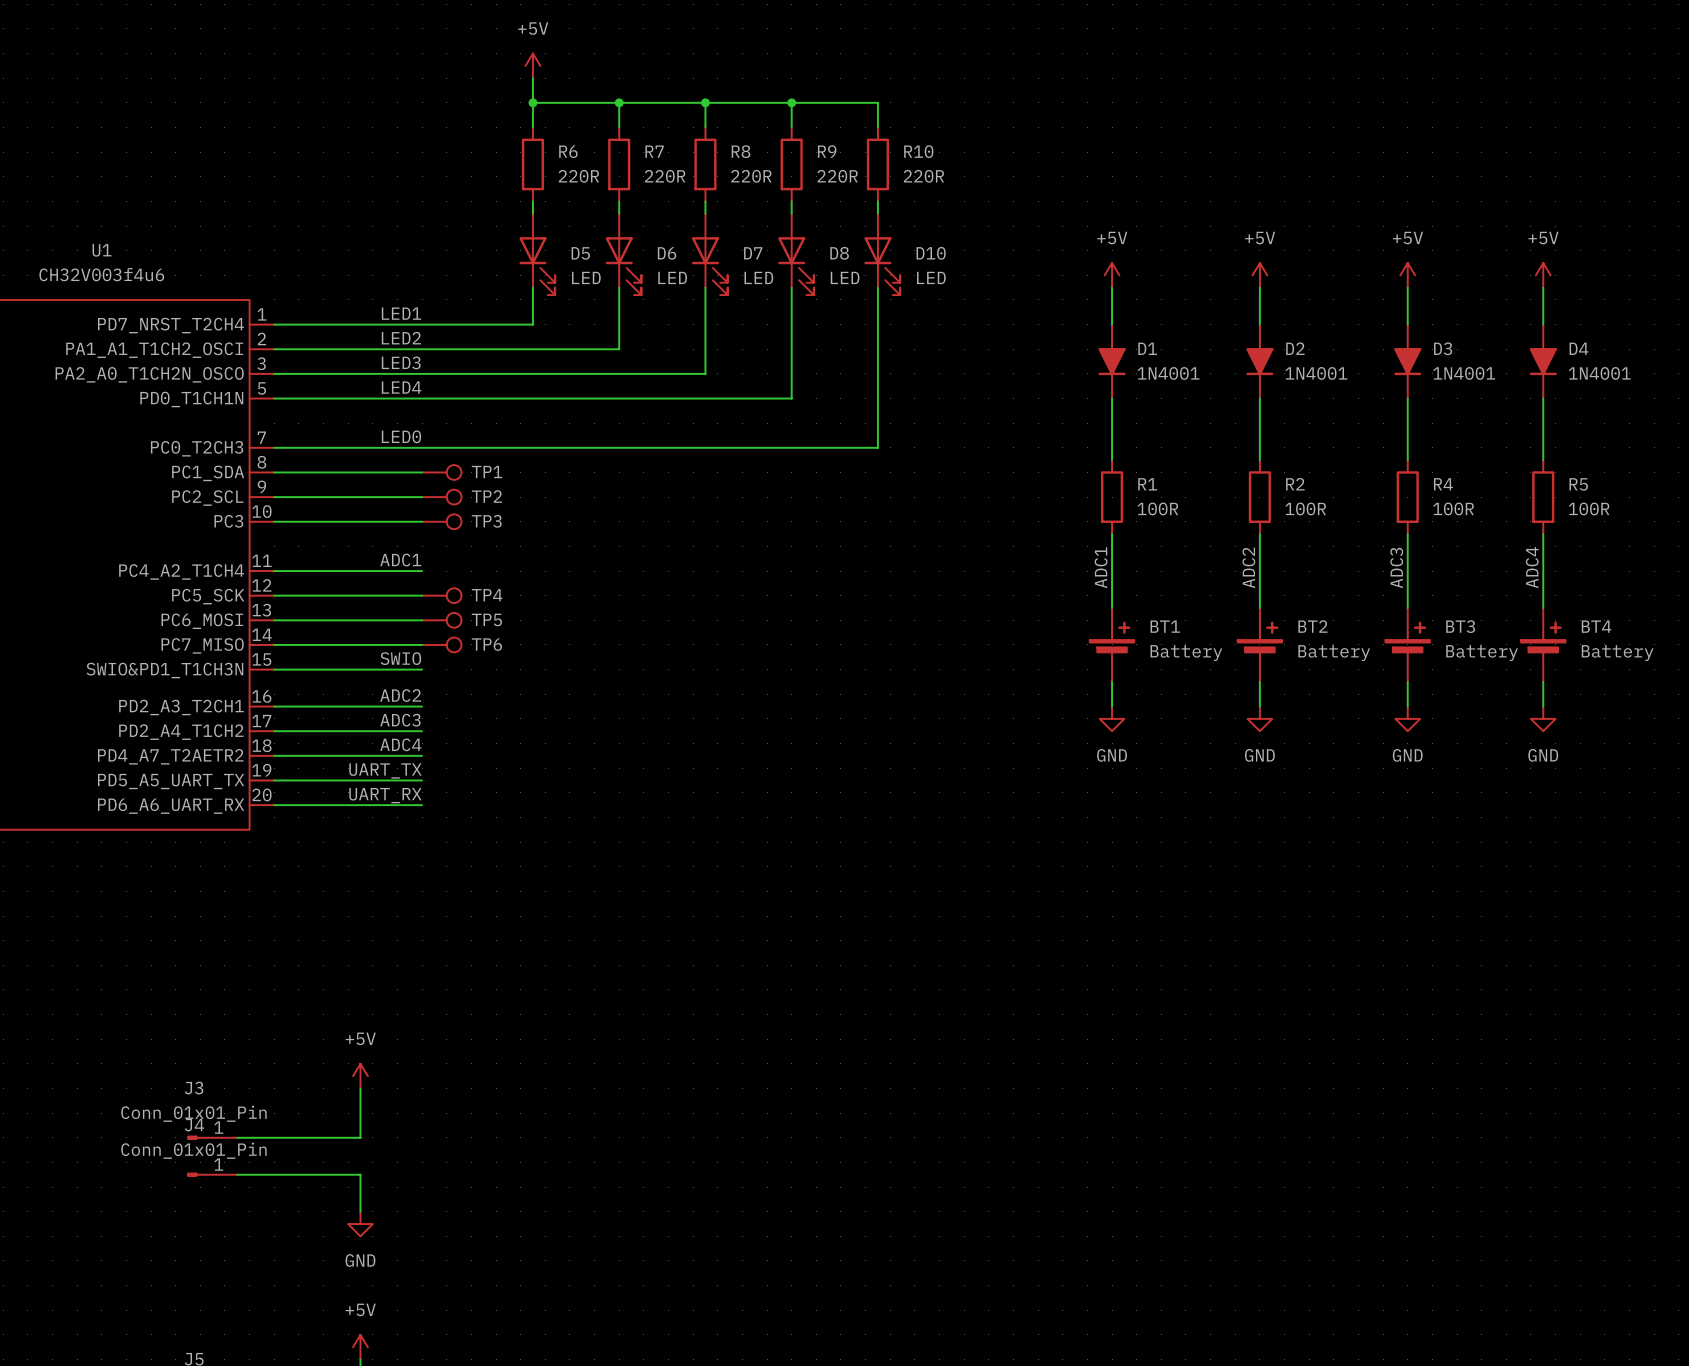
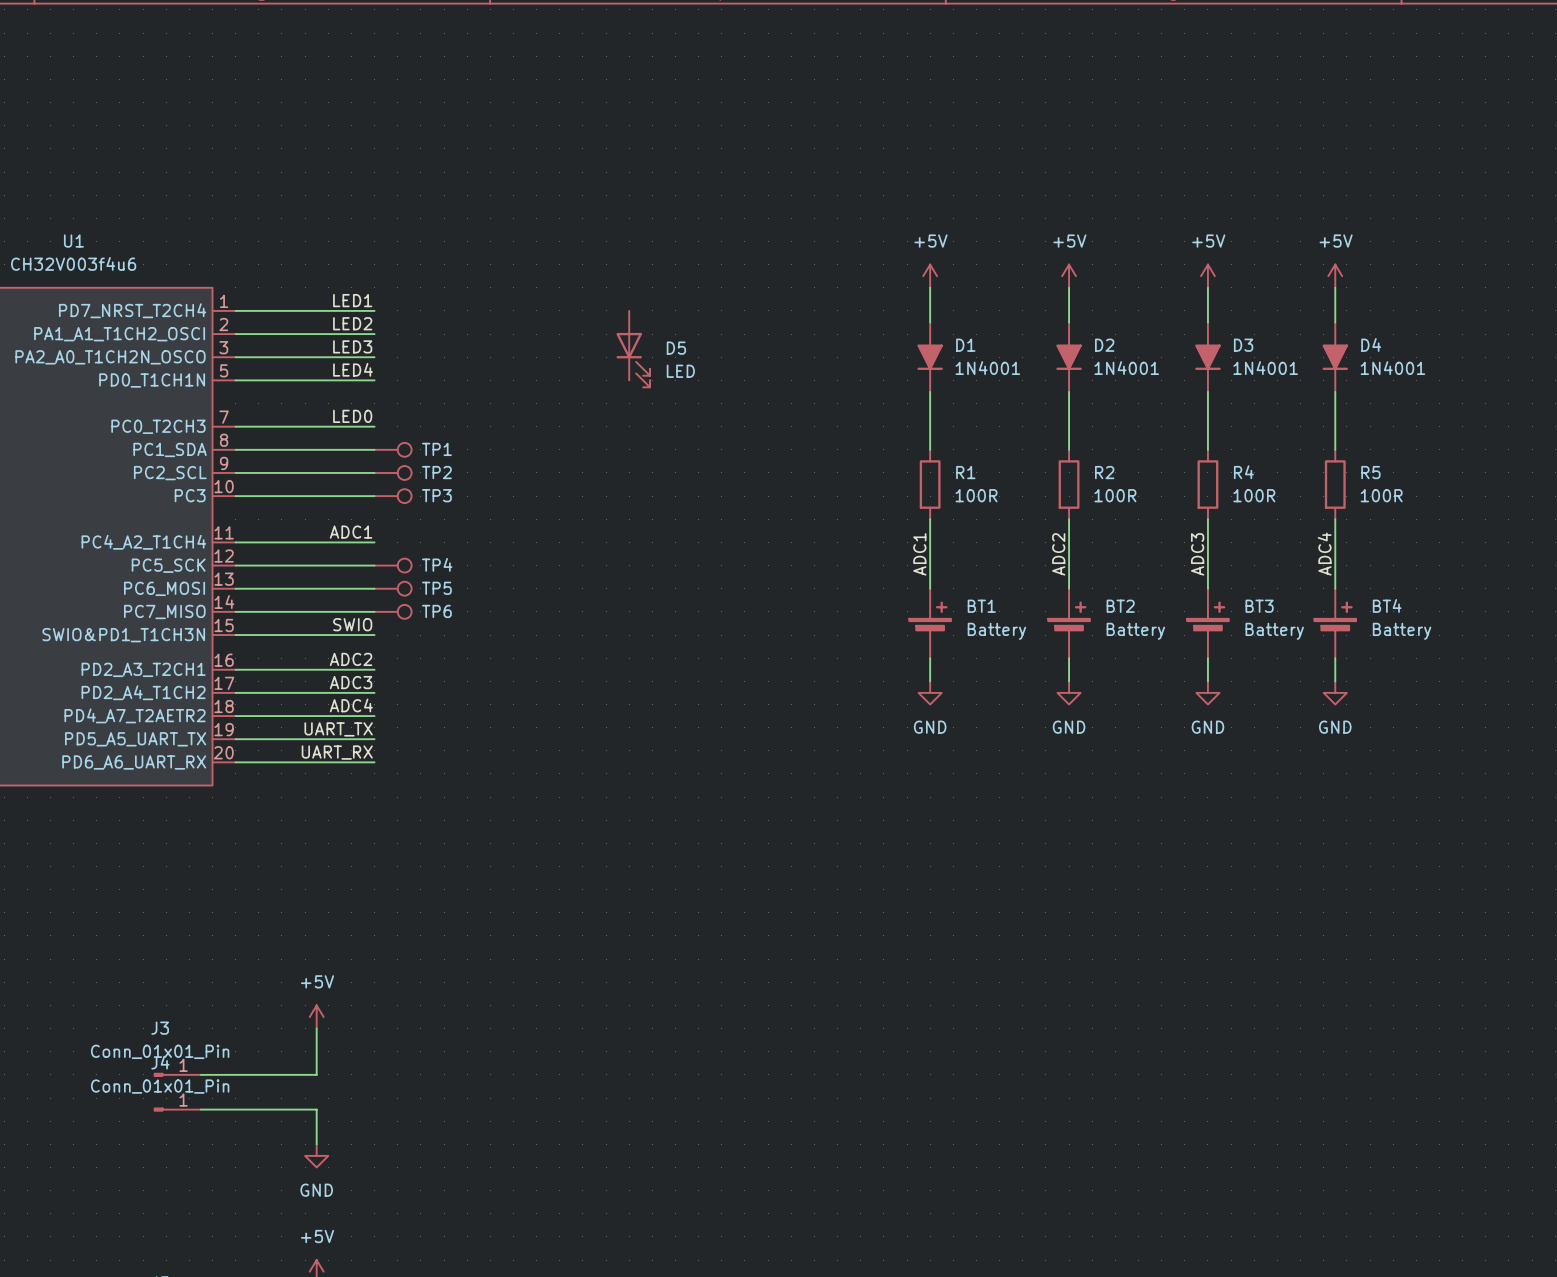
power symbol: +5V (532, 65) -> none
wire: (532, 78) (532, 127) -> none
wire: (532, 102) (877, 102) (877, 127) -> none
junction: (532, 102) -> none
wire: (619, 102) (619, 127) -> none
junction: (619, 102) -> none
wire: (705, 102) (705, 127) -> none
junction: (705, 102) -> none
wire: (791, 102) (791, 127) -> none
junction: (791, 102) -> none
R6: 220R (532, 164) -> none
R7: 220R (619, 164) -> none
R8: 220R (705, 164) -> none
R9: 220R (791, 164) -> none
R10: 220R (877, 164) -> none
wire: (532, 201) (532, 213) -> none
wire: (619, 201) (619, 213) -> none
wire: (705, 201) (705, 213) -> none
wire: (791, 201) (791, 213) -> none
wire: (877, 201) (877, 213) -> none
D5 position: (537, 254) -> (633, 349)
D6: LED (623, 254) -> none
D7: LED (709, 254) -> none
D8: LED (796, 254) -> none
D10: LED (882, 254) -> none
power symbol: +5V (1112, 275) -> none
power symbol: +5V (1259, 275) -> none
power symbol position: +5V (1407, 275) -> +5V (1335, 276)
power symbol: +5V (1543, 275) -> none
wire: (532, 287) (532, 324) (422, 324) -> none
wire: (619, 287) (619, 349) (422, 349) -> none
wire: (705, 287) (705, 373) (422, 373) -> none
wire: (791, 287) (791, 398) (422, 398) -> none
wire: (877, 287) (877, 447) (422, 447) -> none
power symbol: none -> +5V (930, 276)
wire: (1112, 287) (1112, 324) -> (930, 287) (930, 322)
power symbol: none -> +5V (1069, 276)
wire: (1259, 287) (1259, 324) -> (1069, 287) (1069, 322)
power symbol: none -> +5V (1207, 276)
wire: (1407, 287) (1407, 324) -> (1207, 287) (1207, 322)
wire: (1543, 287) (1543, 324) -> (1335, 287) (1335, 322)
D1 position: (1112, 361) -> (930, 357)
D2 position: (1259, 361) -> (1069, 357)
D3 position: (1407, 361) -> (1207, 357)
D4 position: (1543, 361) -> (1335, 357)
wire: (1112, 398) (1112, 460) -> (930, 391) (930, 449)
wire: (1259, 398) (1259, 460) -> (1069, 391) (1069, 449)
wire: (1407, 398) (1407, 460) -> (1207, 391) (1207, 449)
wire: (1543, 398) (1543, 460) -> (1335, 391) (1335, 449)
R1 position: (1112, 497) -> (930, 484)
R2 position: (1259, 497) -> (1069, 484)
R4 position: (1407, 497) -> (1207, 484)
R5 position: (1543, 497) -> (1335, 484)
wire: (1112, 534) (1112, 608) -> (930, 519) (930, 588)
wire: (1259, 534) (1259, 608) -> (1069, 519) (1069, 588)
wire: (1407, 534) (1407, 608) -> (1207, 519) (1207, 588)
wire: (1543, 534) (1543, 608) -> (1335, 519) (1335, 588)
label position: ADC1 (1101, 567) -> ADC1 (919, 554)
label position: ADC2 (1248, 567) -> ADC2 (1058, 554)
label position: ADC4 (1532, 567) -> ADC4 (1324, 554)
label position: ADC3 (1396, 568) -> ADC3 (1197, 554)
BT1 position: (1112, 644) -> (930, 623)
BT2 position: (1259, 644) -> (1069, 623)
BT3 position: (1407, 644) -> (1207, 623)
BT4 position: (1543, 644) -> (1335, 623)
wire: (1112, 681) (1112, 706) -> (930, 658) (930, 681)
wire: (1259, 681) (1259, 706) -> (1069, 658) (1069, 681)
wire: (1407, 681) (1407, 706) -> (1207, 658) (1207, 681)
wire: (1543, 681) (1543, 706) -> (1335, 658) (1335, 681)
power symbol: GND (1112, 718) -> none
power symbol: GND (1259, 718) -> none
power symbol position: GND (1407, 718) -> GND (1335, 692)
power symbol: GND (1543, 718) -> none
power symbol: none -> GND (930, 692)
power symbol: none -> GND (1069, 692)
power symbol: none -> GND (1207, 692)

